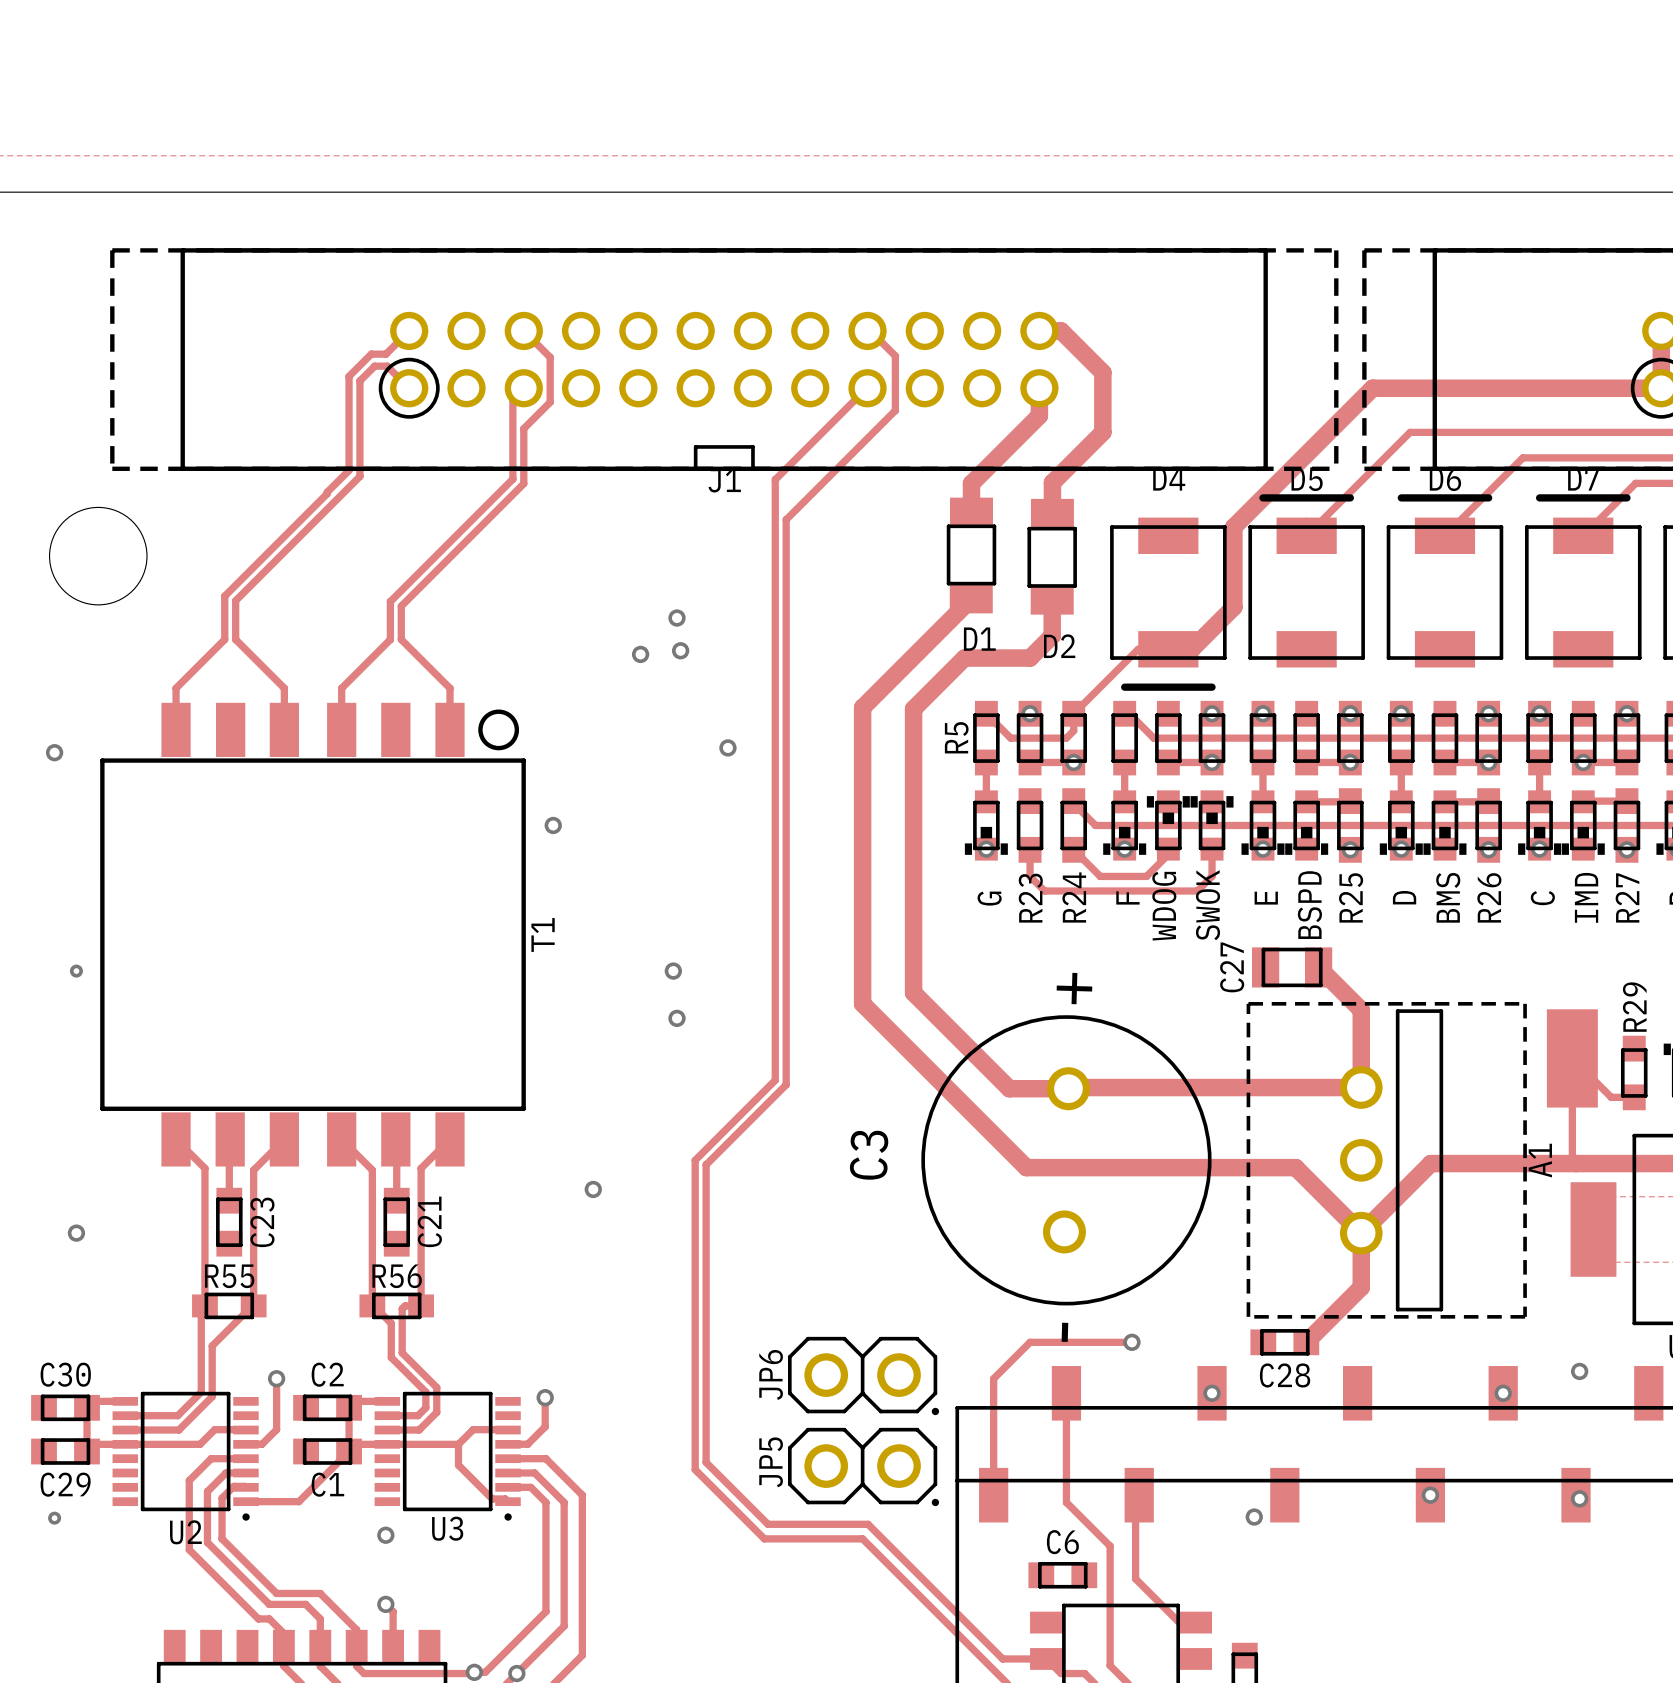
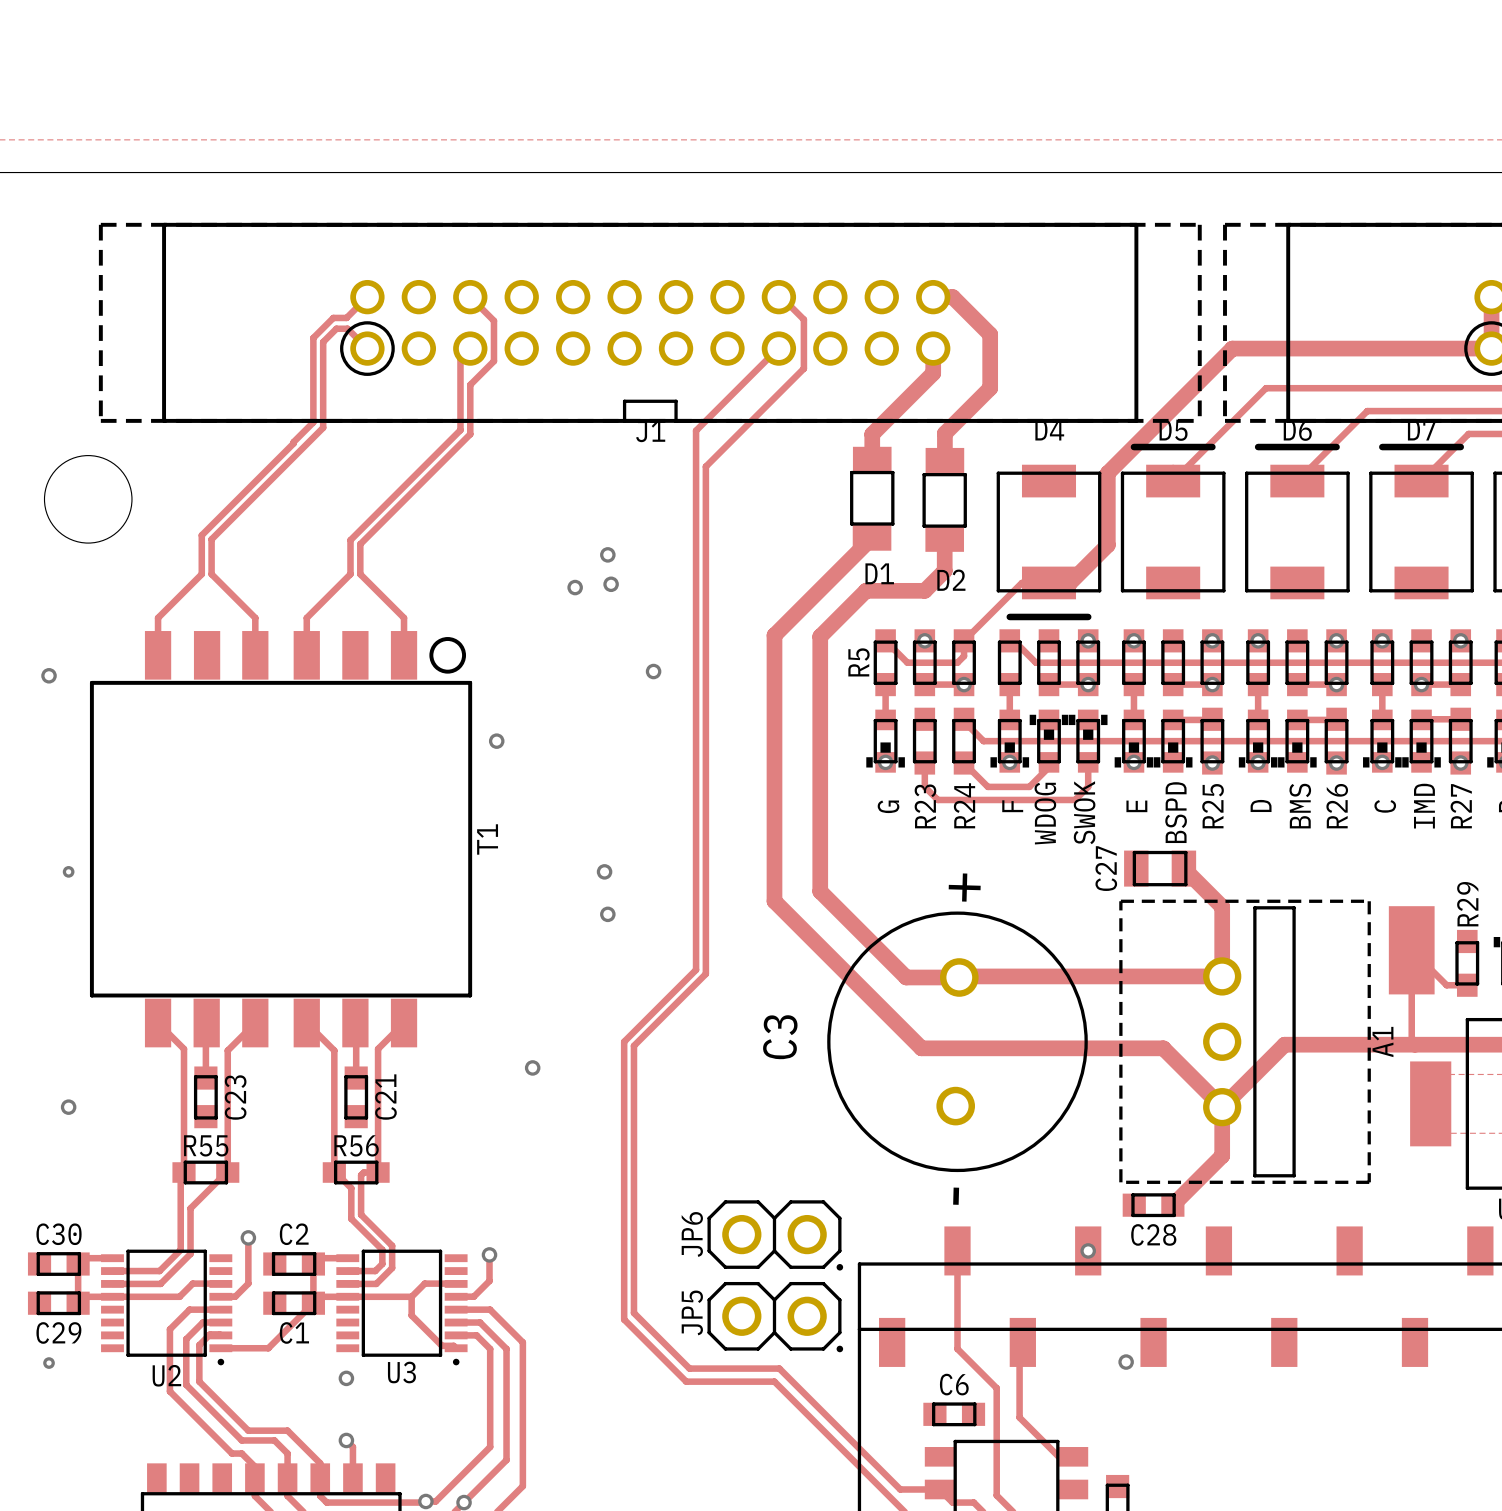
track: (1131, 1342) (1030, 1342) (993, 1378) (993, 1495) -> none
via: (1131, 1342) -> none
via: (1579, 1371) -> none
via: (1503, 1393) -> none
via: (1430, 1495) -> none
via: (1579, 1498) -> none

